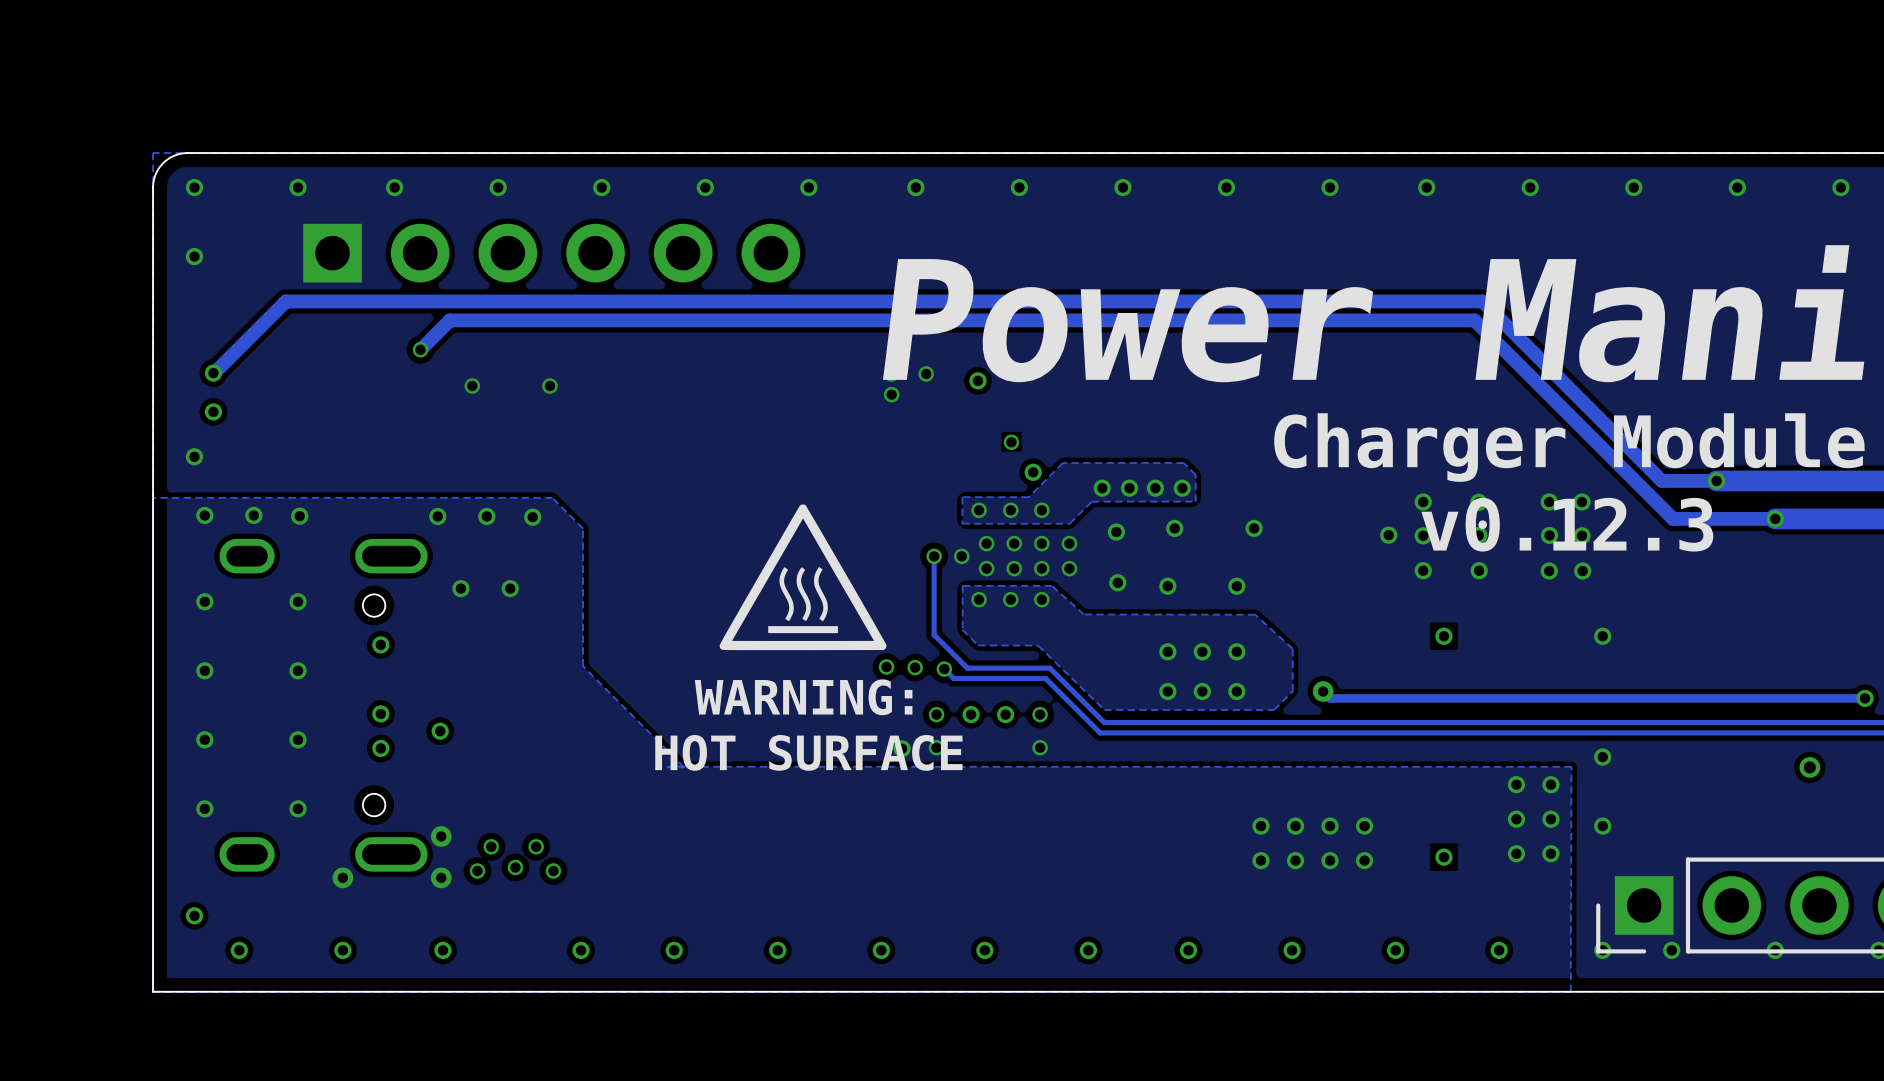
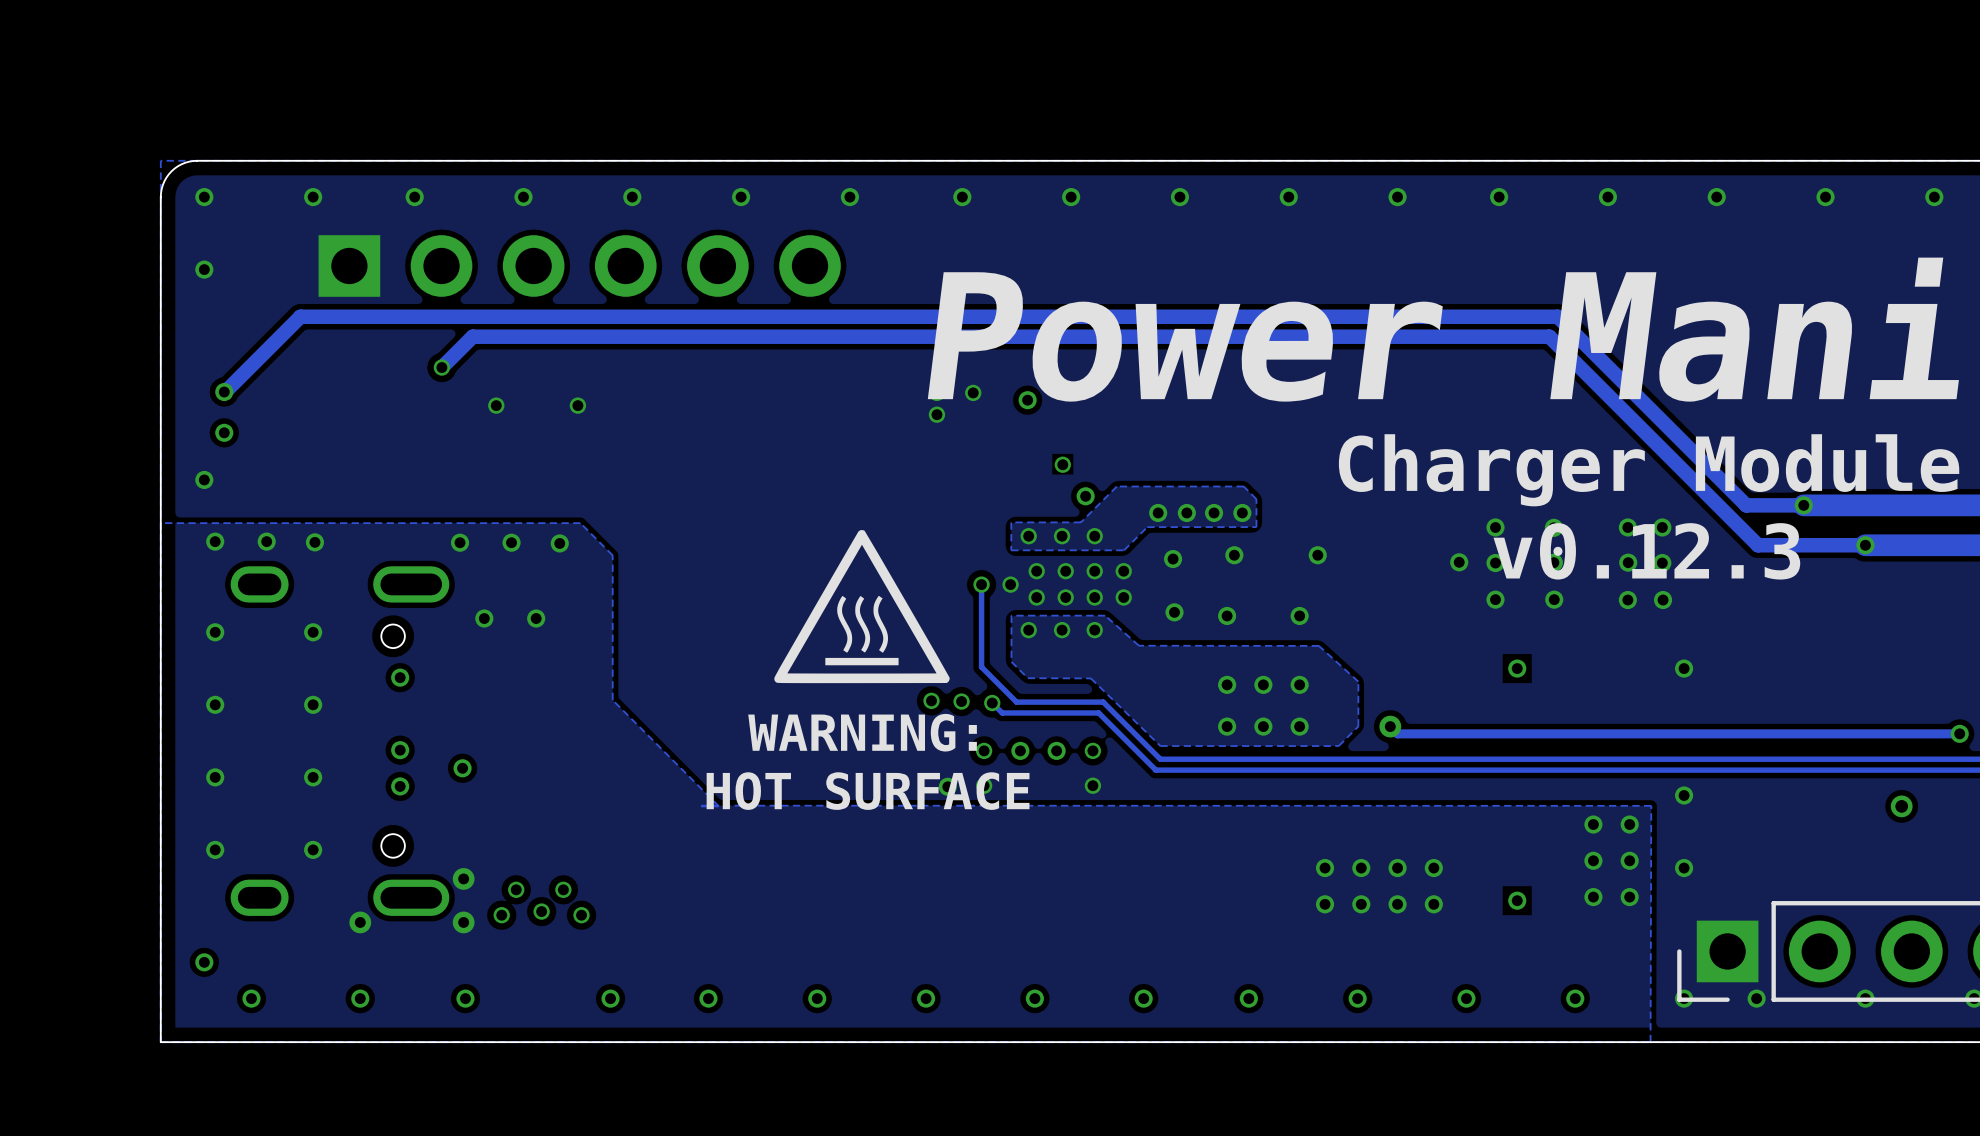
drawing position: (803, 577) -> (861, 606)
text position: WARNING: (803, 697) -> WARNING: (862, 732)
text position: HOT SURFACE (808, 752) -> HOT SURFACE (868, 791)

